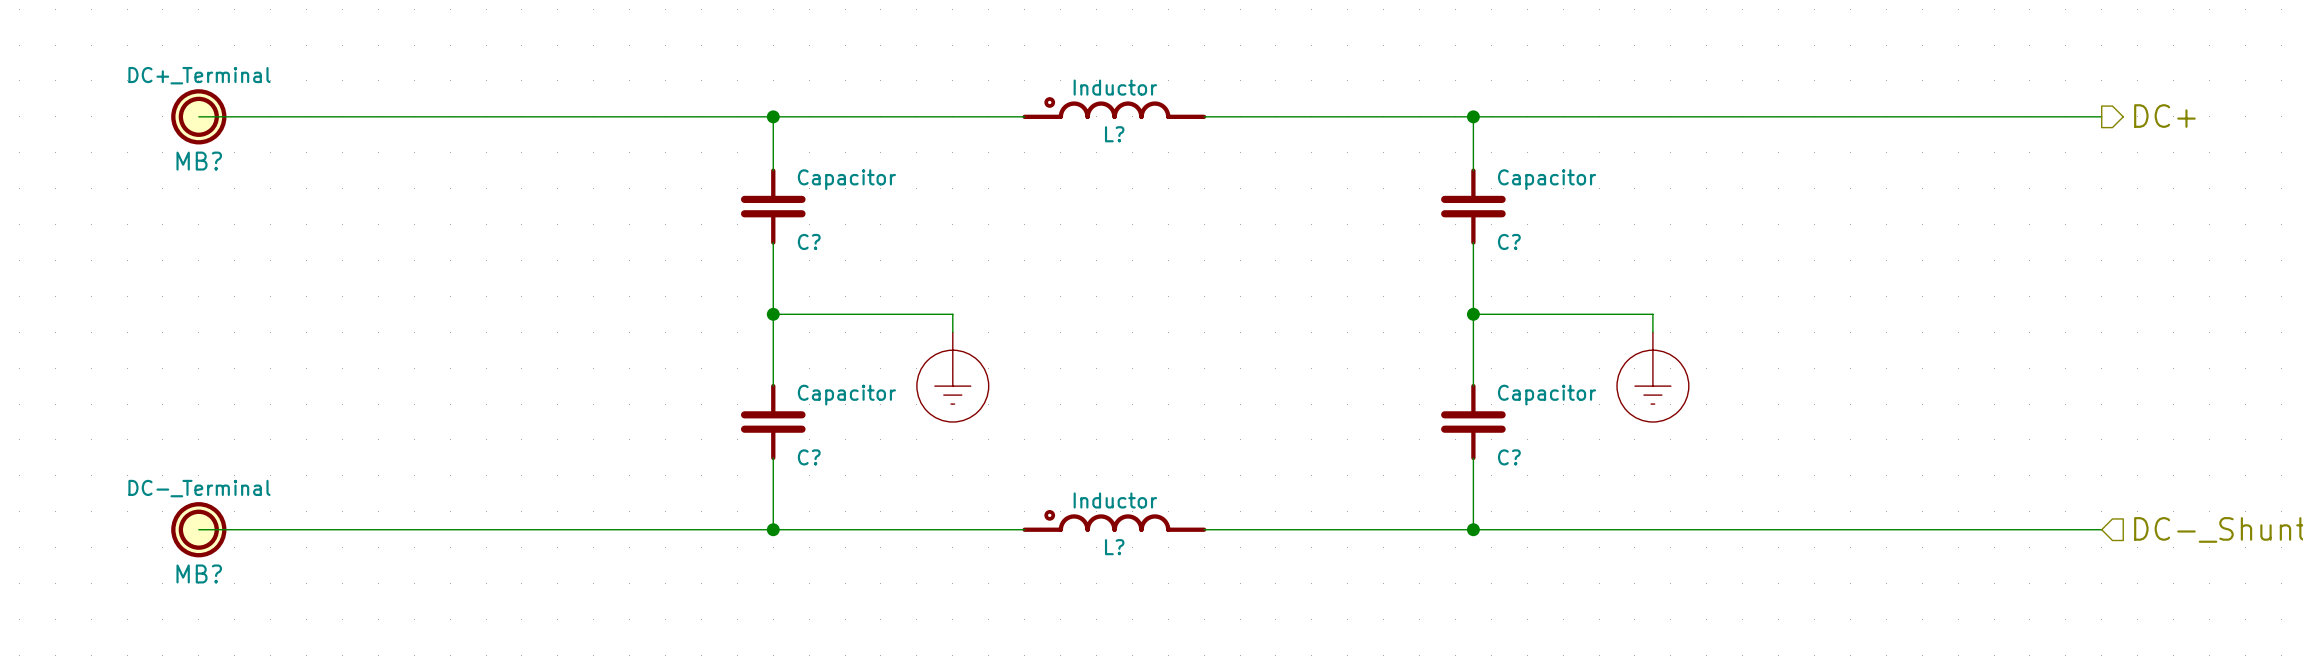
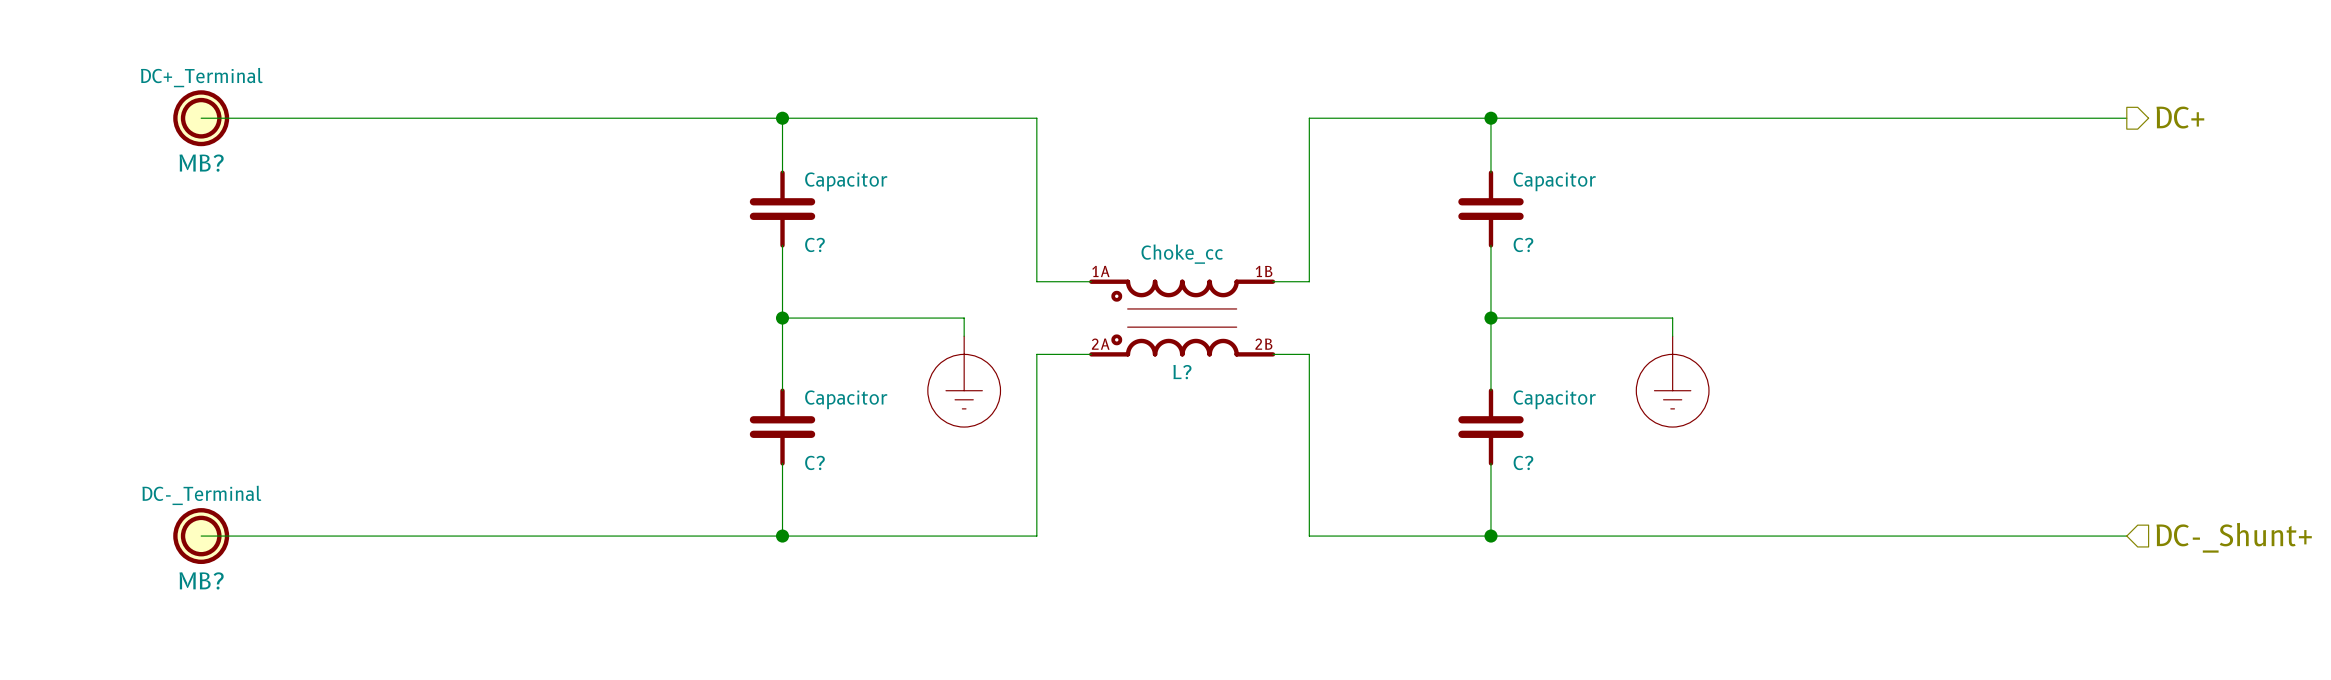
L?: Inductor (1114, 108) -> none
wire: none -> (1036, 118) (1036, 281) (1091, 281)
wire: (1204, 116) (1293, 116) -> (1272, 281) (1309, 281) (1309, 118)
L?: none -> Choke_cc (1182, 318)
wire: none -> (1091, 354) (1036, 354) (1036, 536)
L?: Inductor (1114, 520) -> none
wire: (1204, 529) (1293, 529) -> (1272, 354) (1309, 354) (1309, 536)

